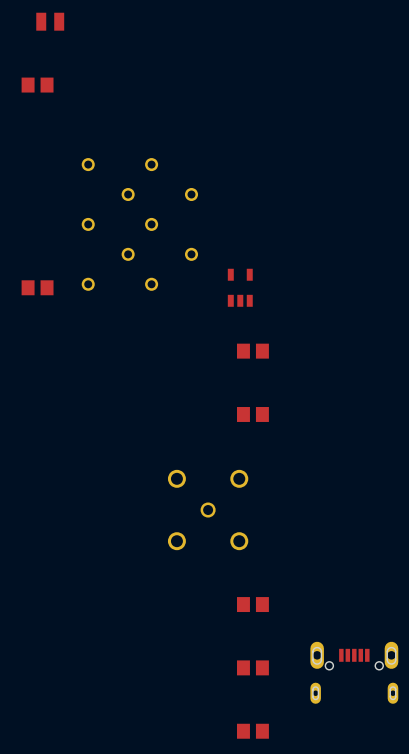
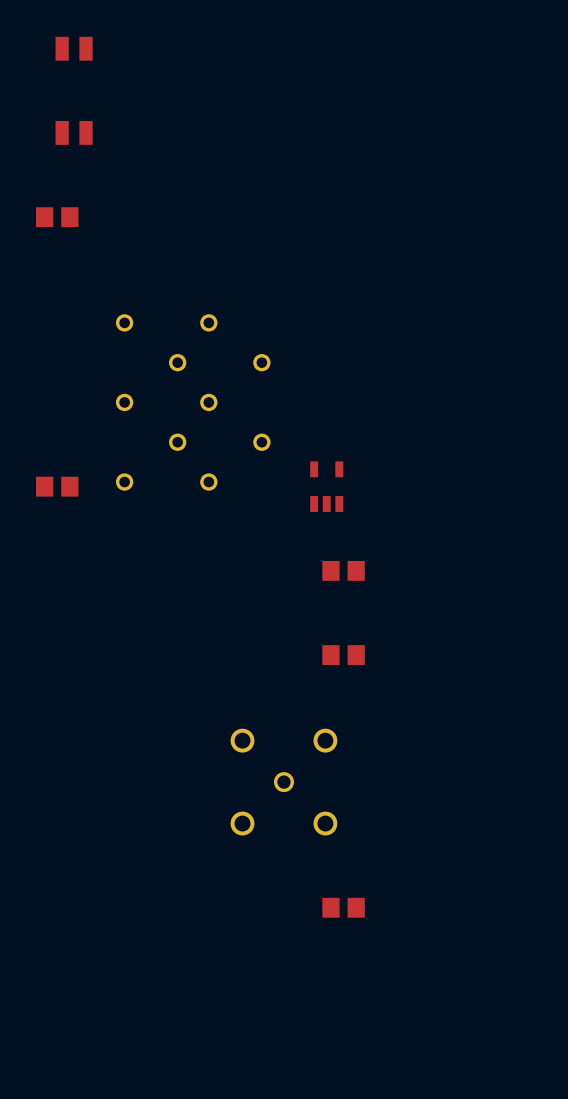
part: (252, 667) -> none
part: (354, 672) -> none
part: (252, 731) -> none

